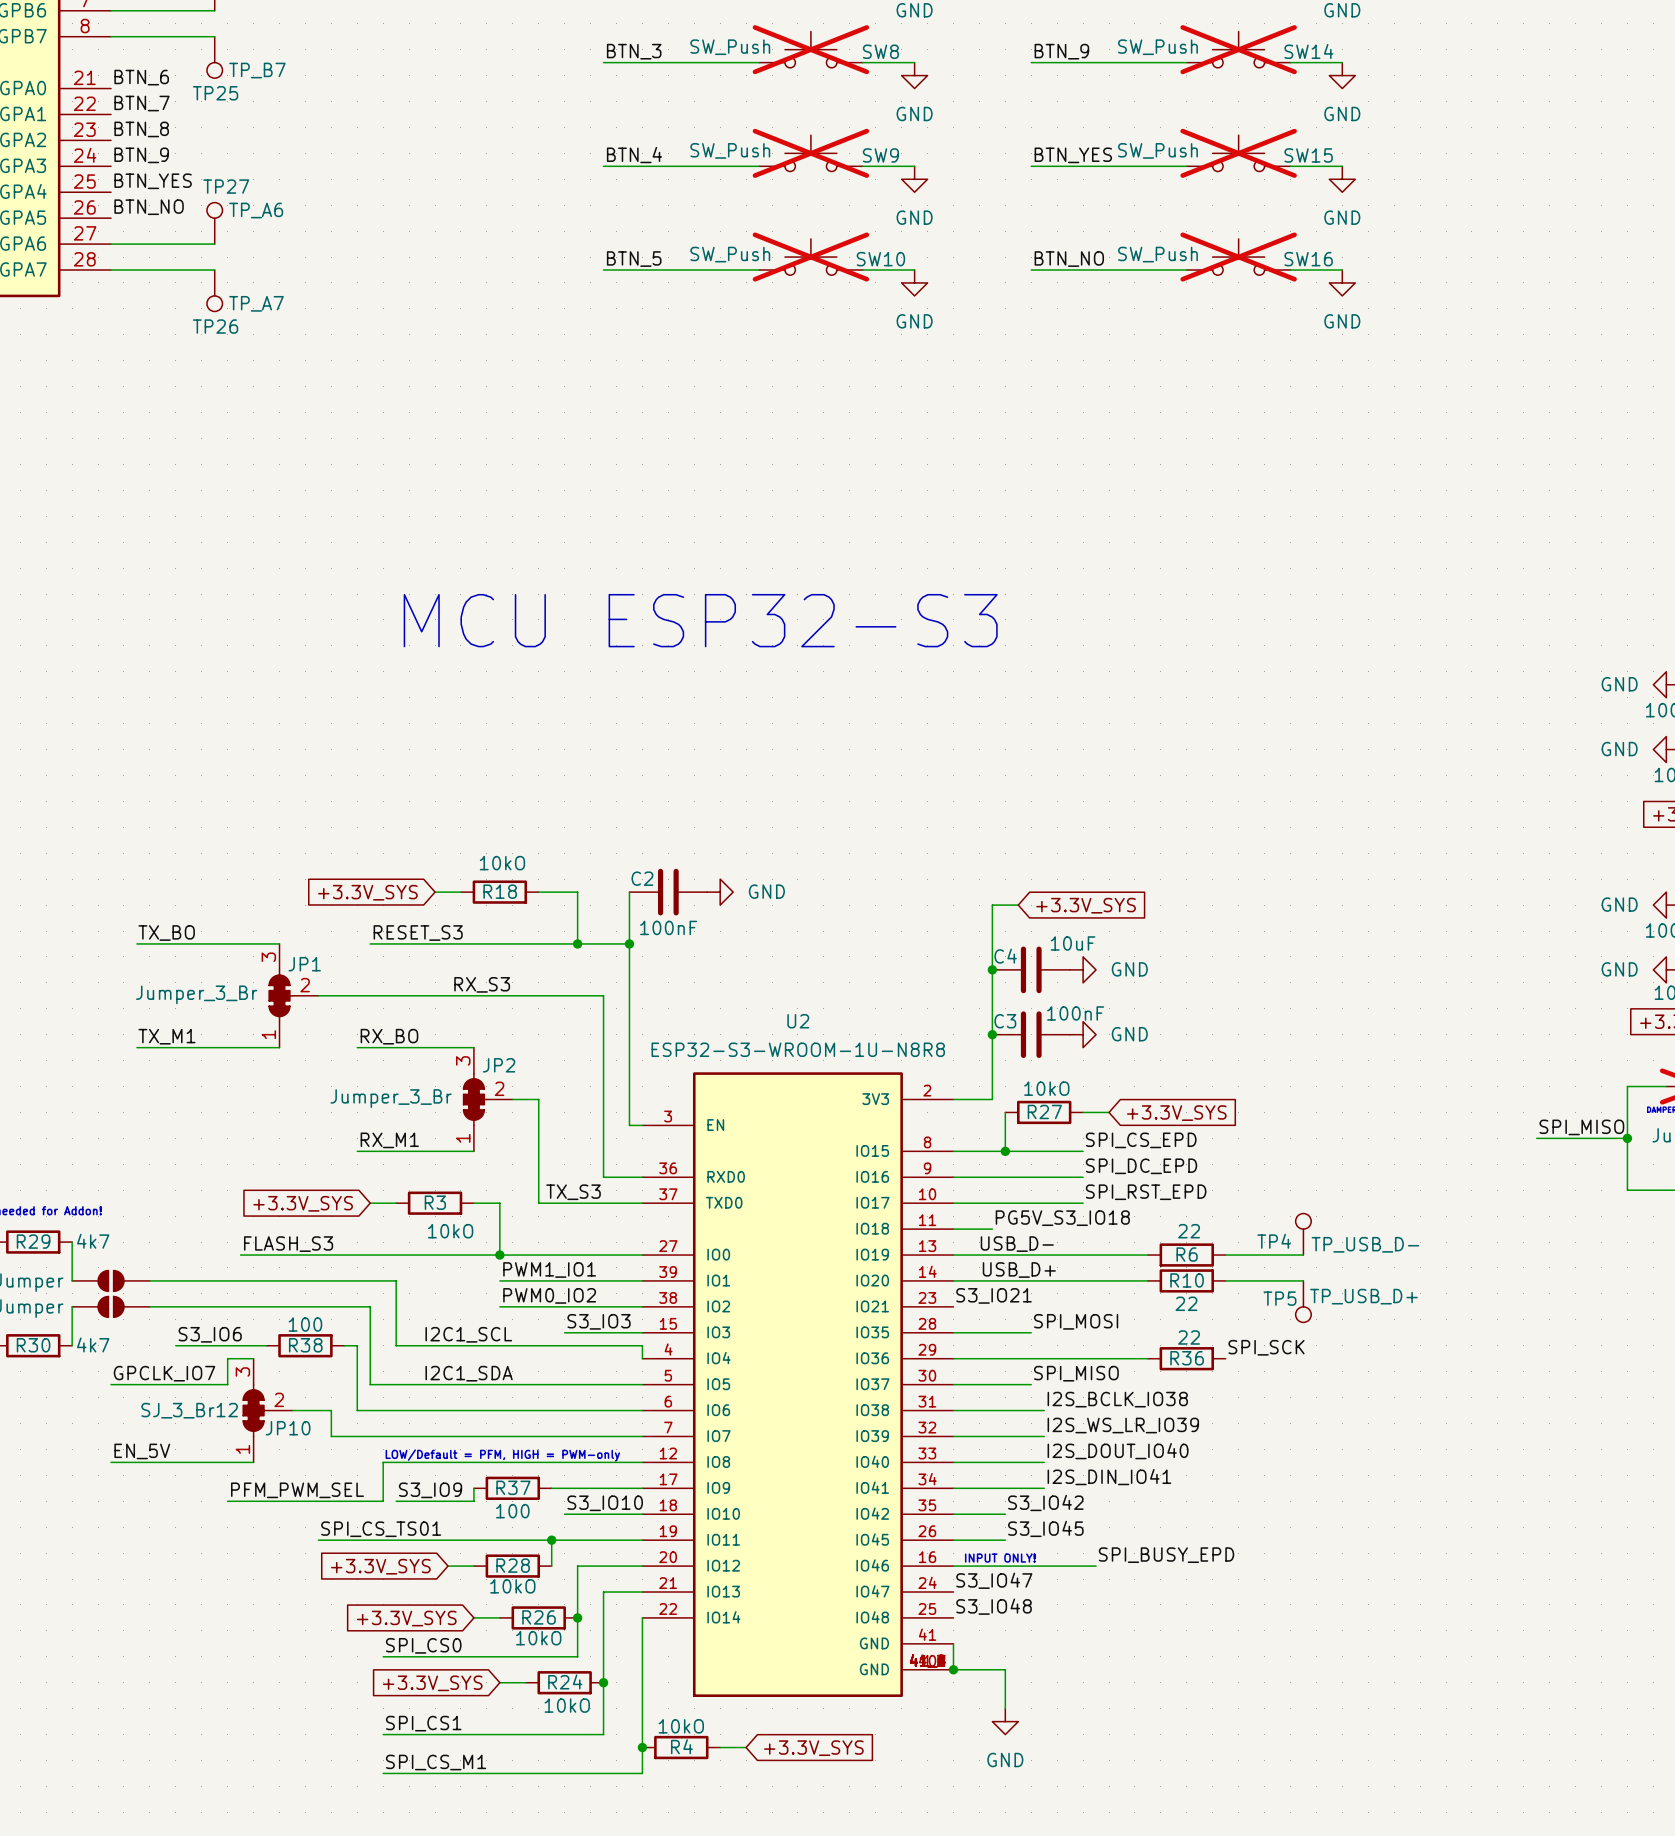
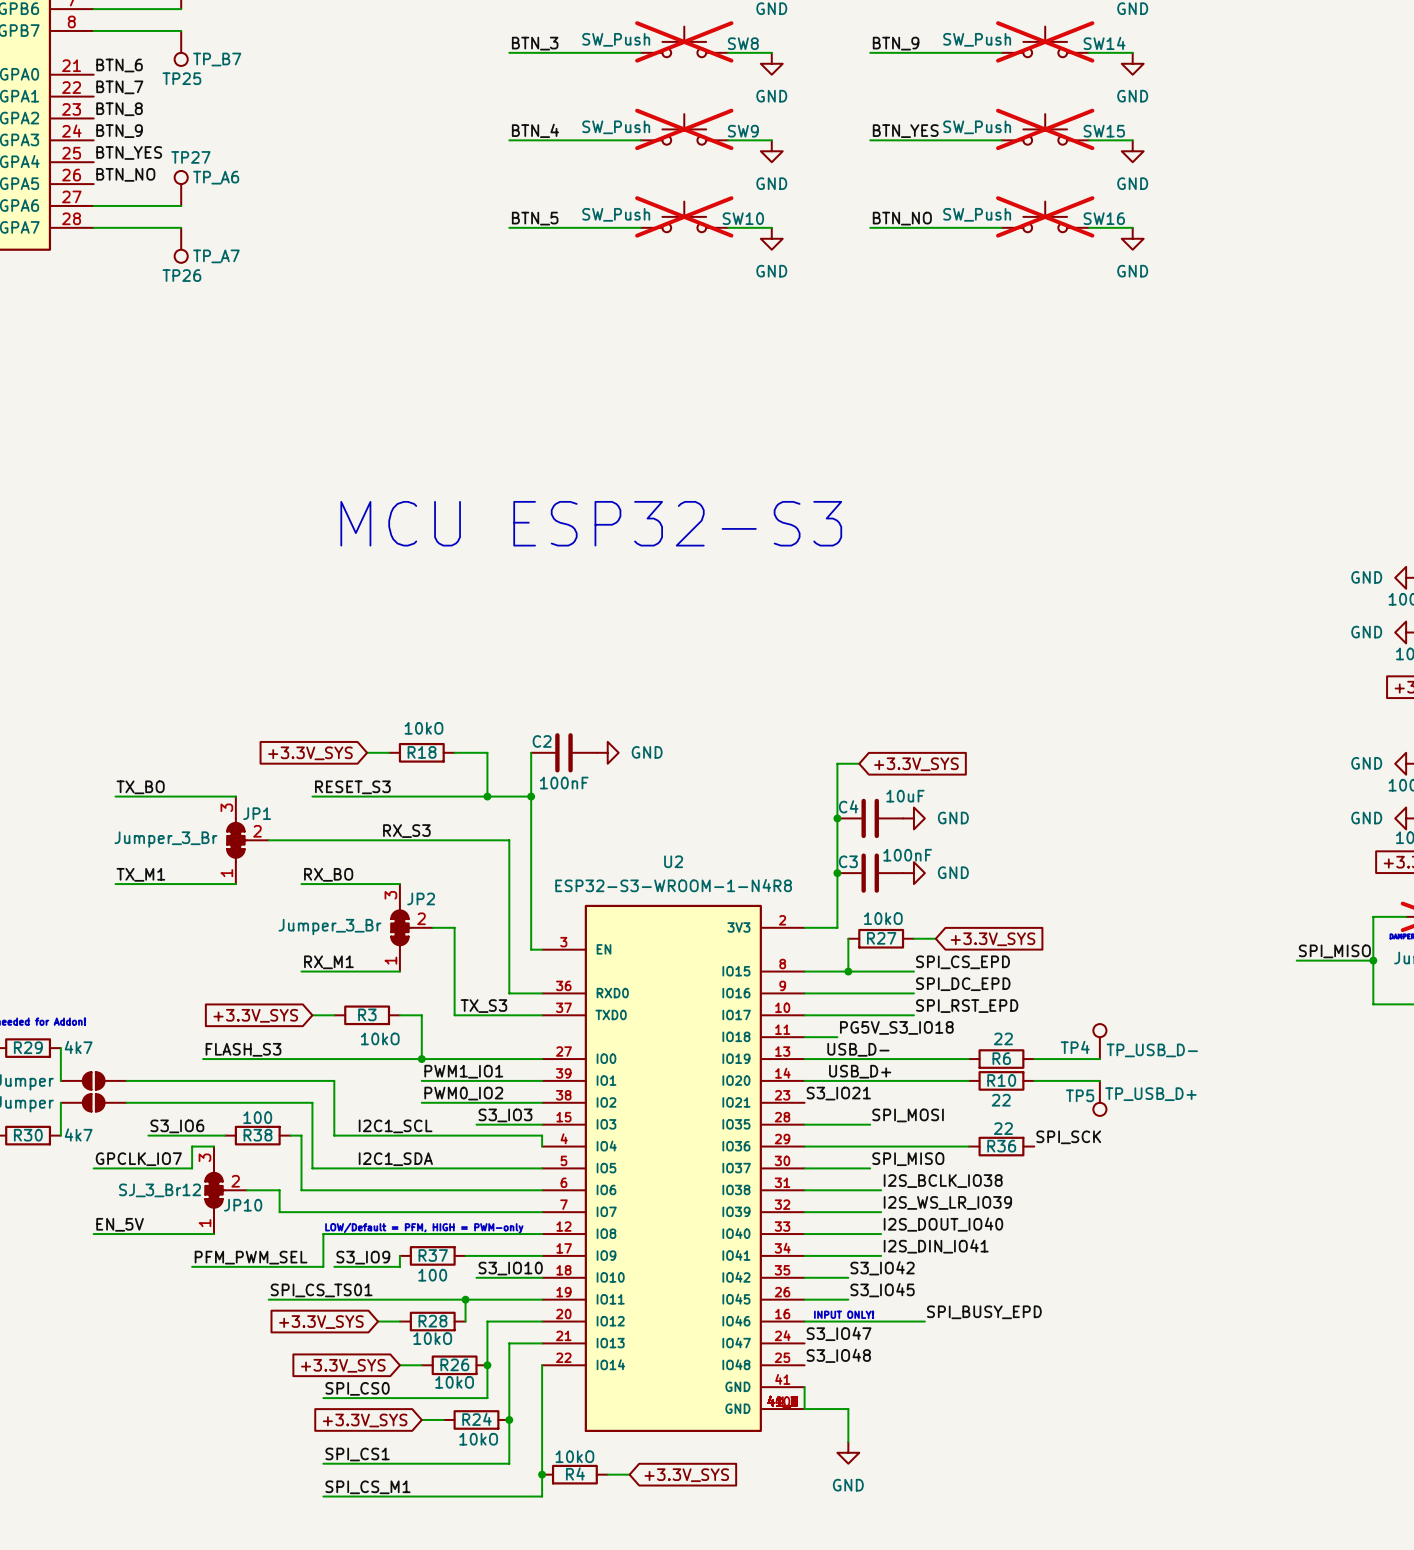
U2 value: ESP32-S3-WROOM-1U-N8R8 (798, 1049) -> ESP32-S3-WROOM-1-N4R8 (673, 885)
junction: (953, 1669) -> none

